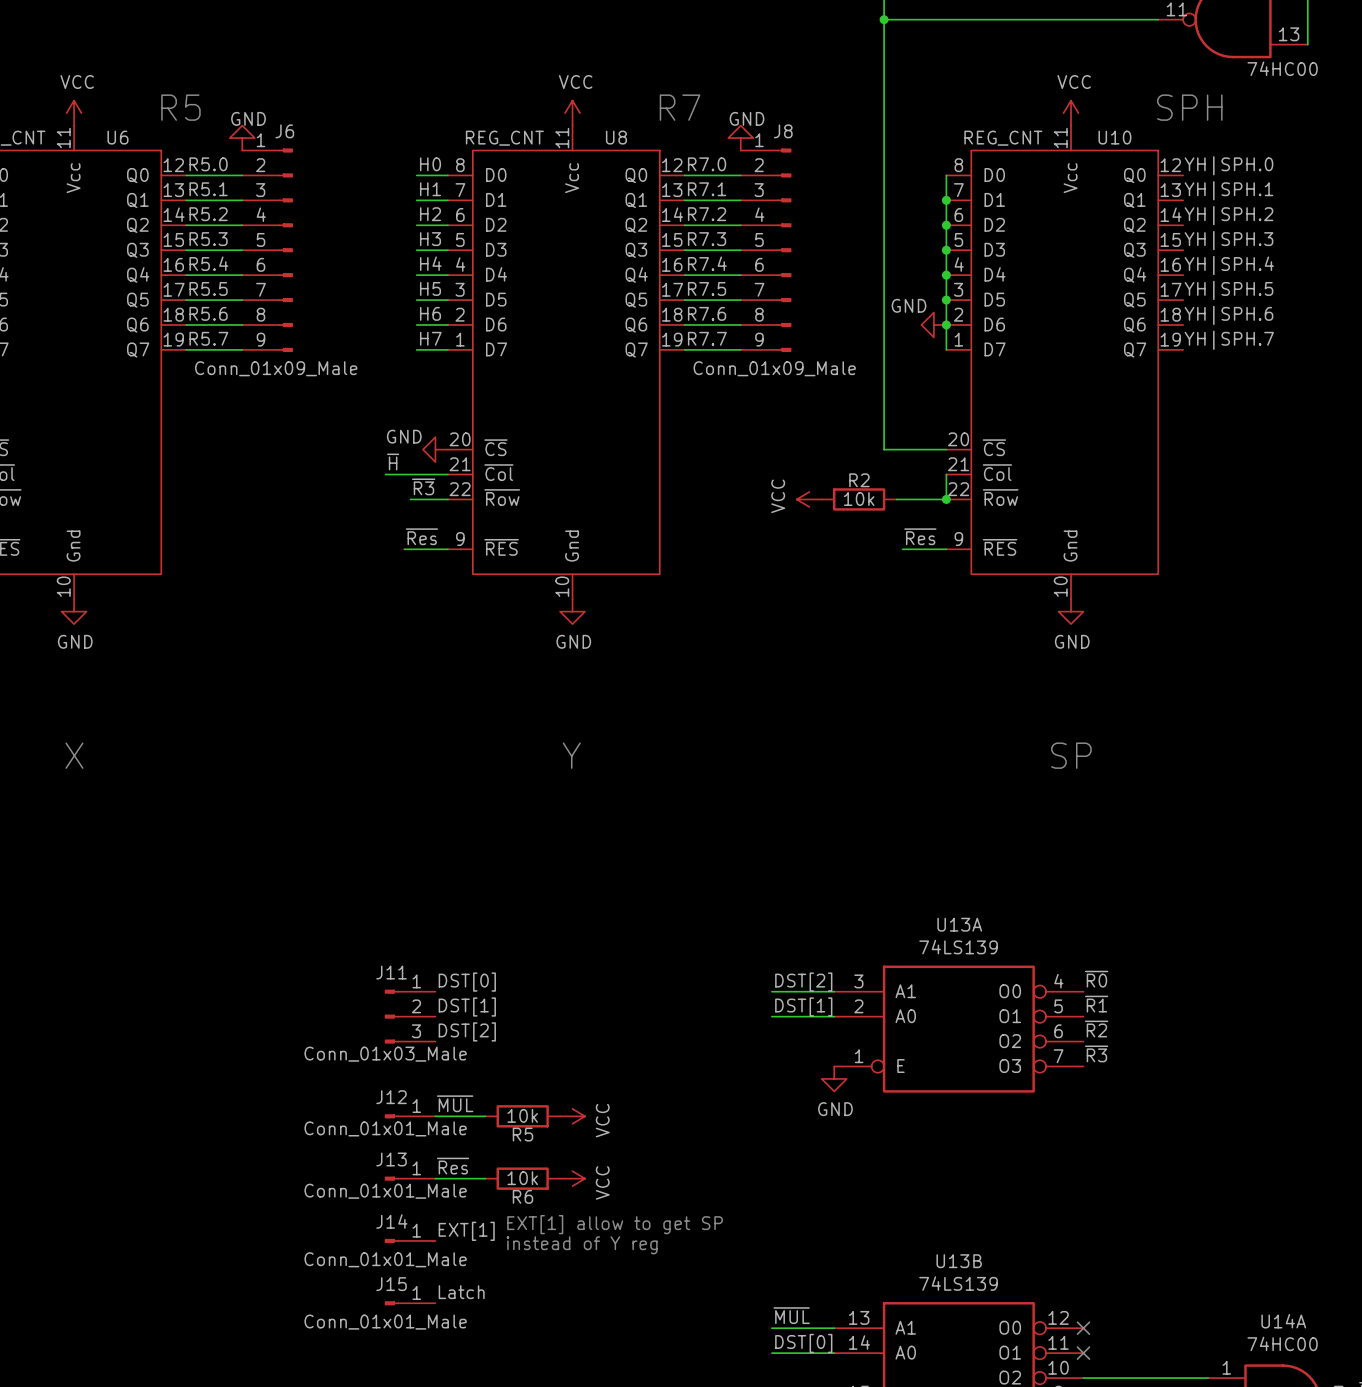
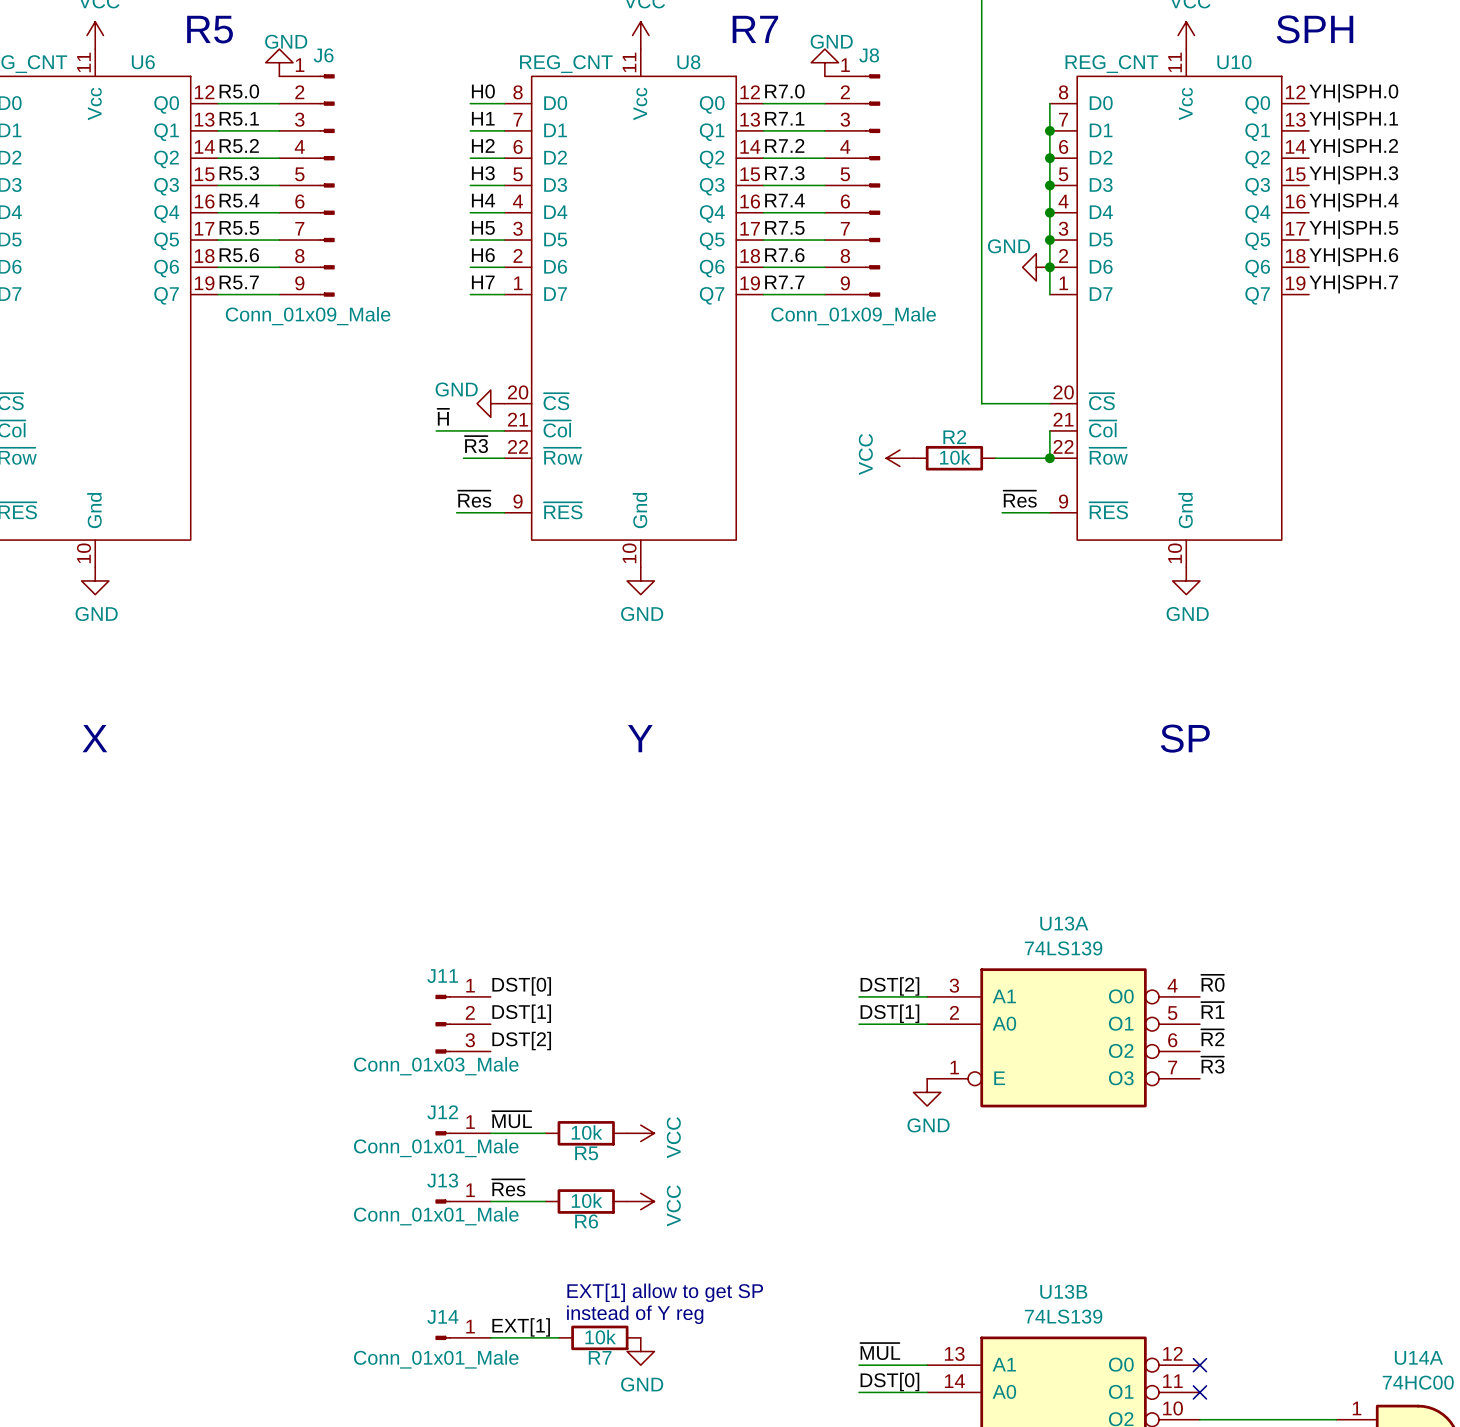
text position: EXT[1] allow to get SP (615, 1224) -> EXT[1] allow to get SP (665, 1292)
label: EXT[1] (466, 1231) -> none
J14: Conn_01x01_Male (410, 1240) -> none
text position: instead of Y reg (582, 1245) -> instead of Y reg (635, 1314)
J15 name: J15 (391, 1284) -> J14 (442, 1317)
label: Latch (461, 1292) -> EXT[1] (521, 1327)
wire: none -> (490, 1337) (558, 1337)
R7: none -> 10k (599, 1337)
power symbol: none -> GND (640, 1351)

